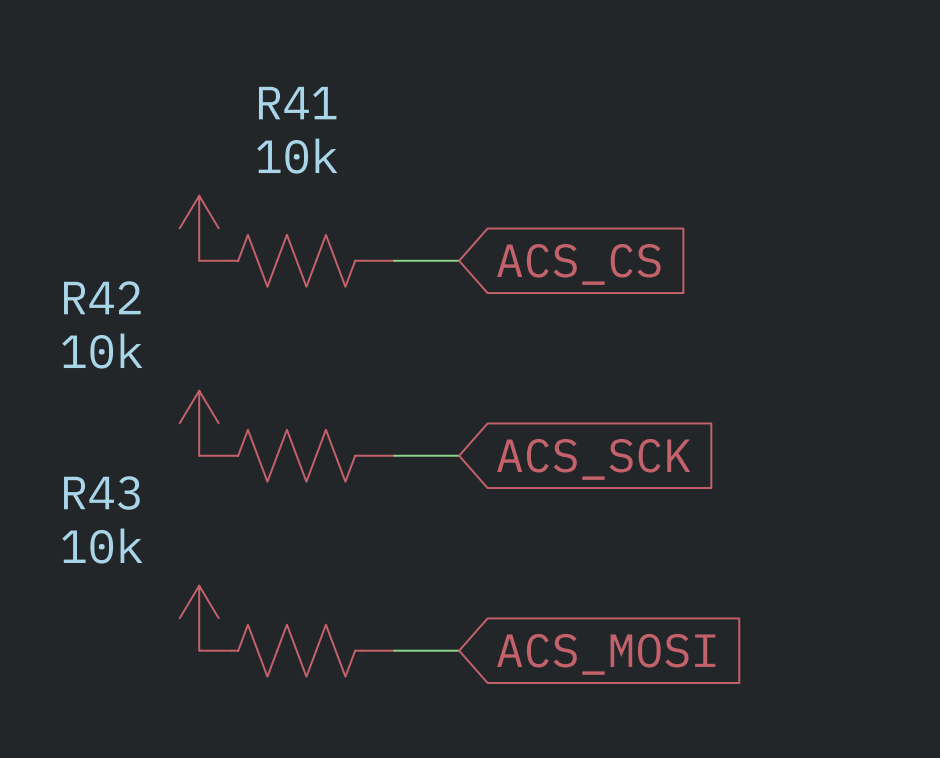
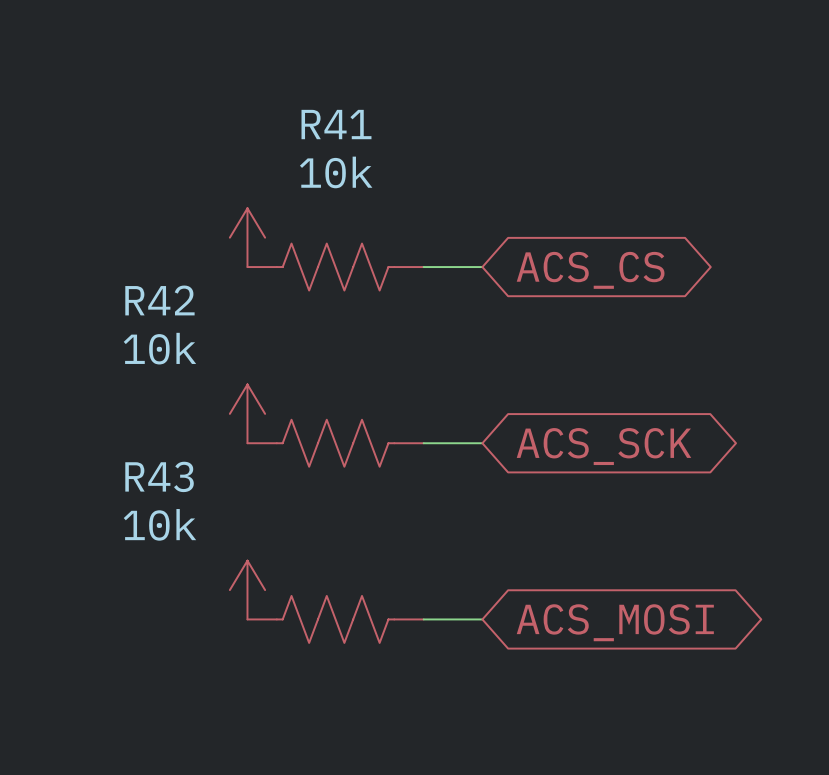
global label shape: input (578, 264) -> bidirectional (590, 270)
global label shape: input (593, 459) -> bidirectional (603, 446)
global label shape: input (606, 654) -> bidirectional (615, 622)

